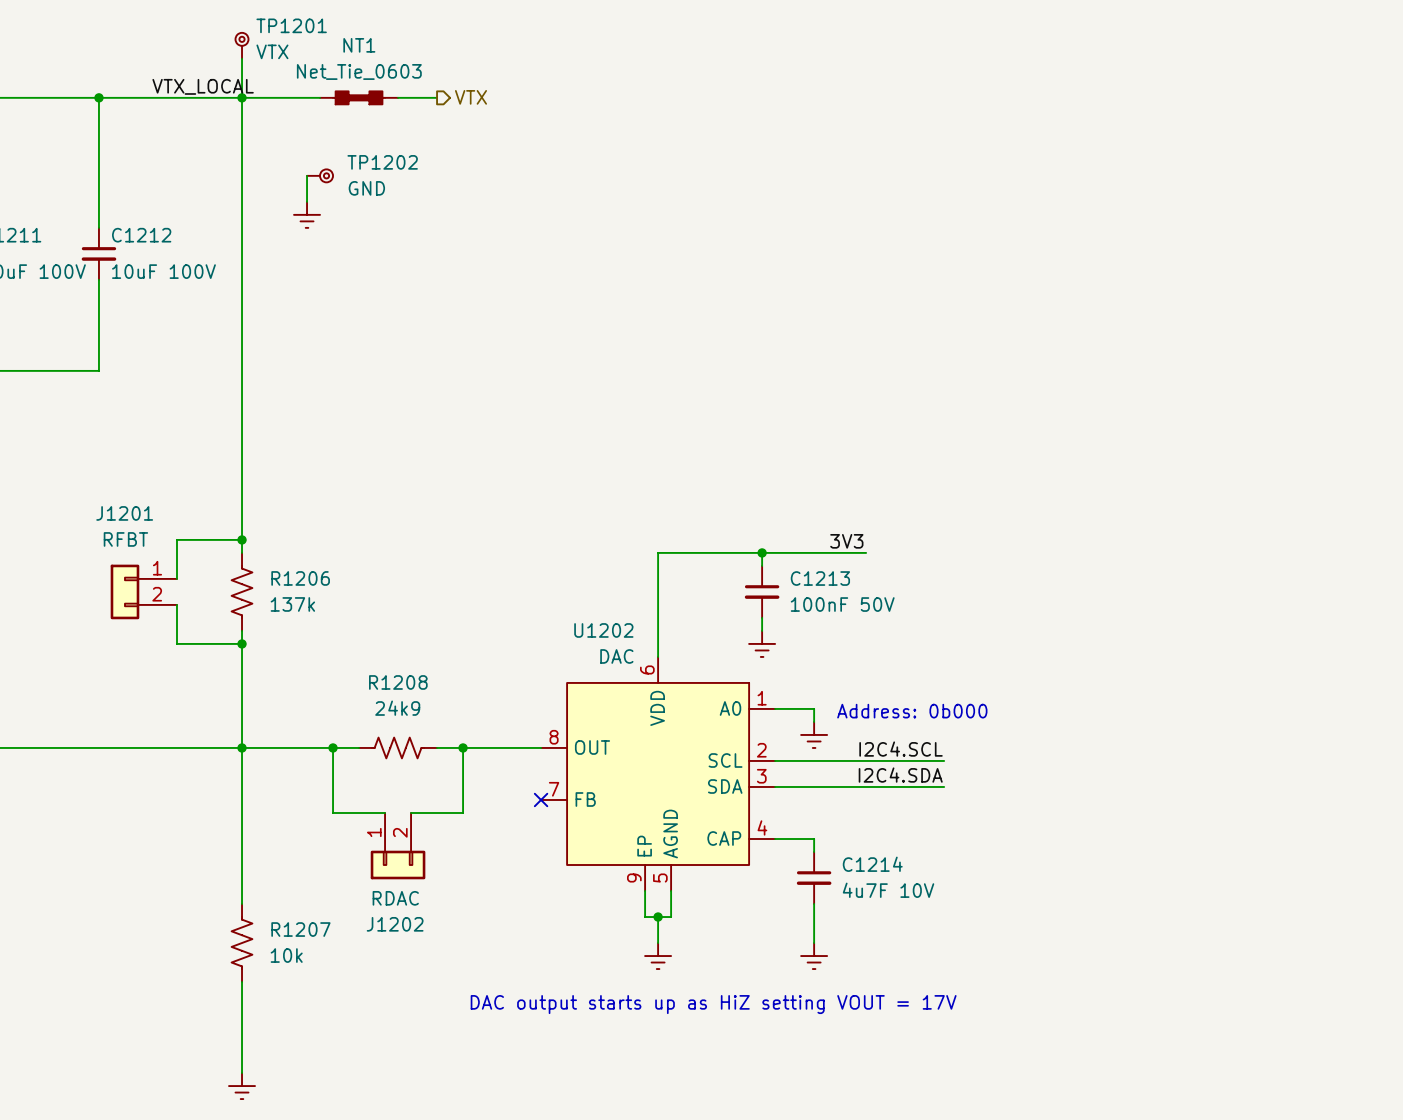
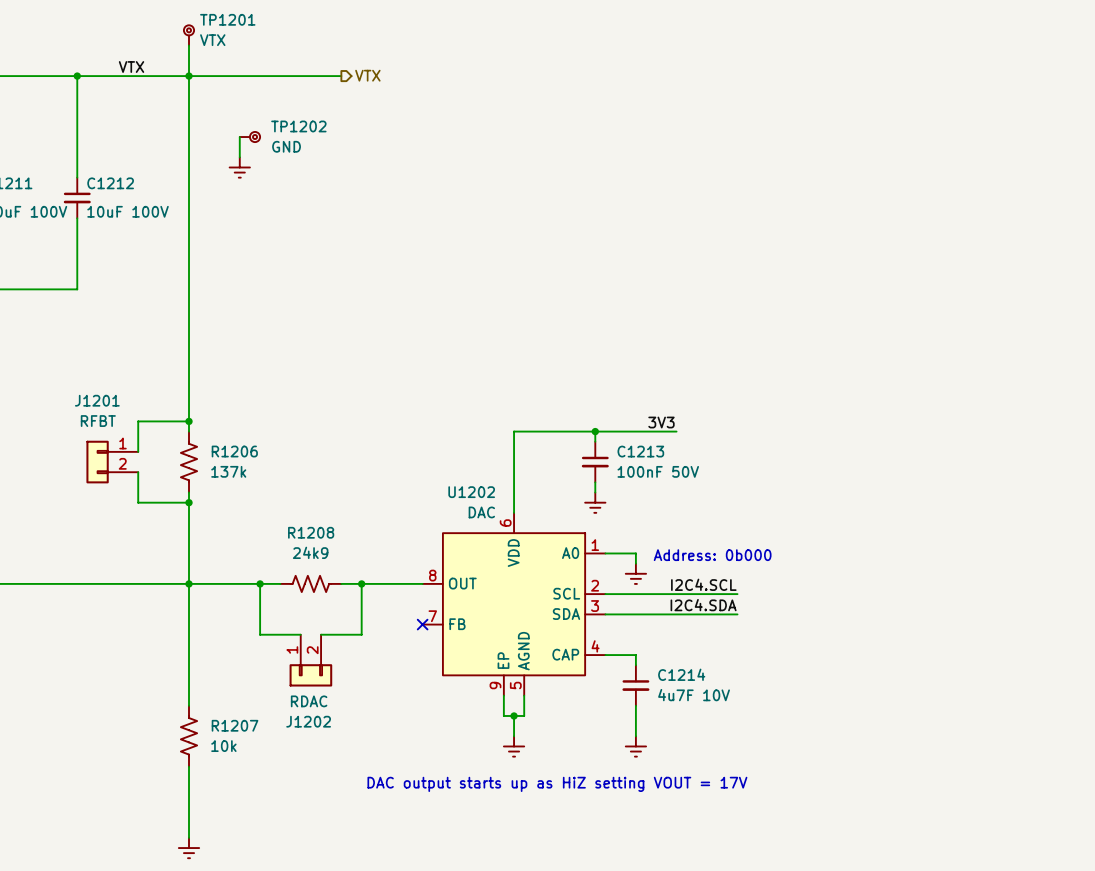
label: VTX_LOCAL (203, 86) -> VTX (131, 67)
NT1: Net_Tie_0603 (359, 97) -> none

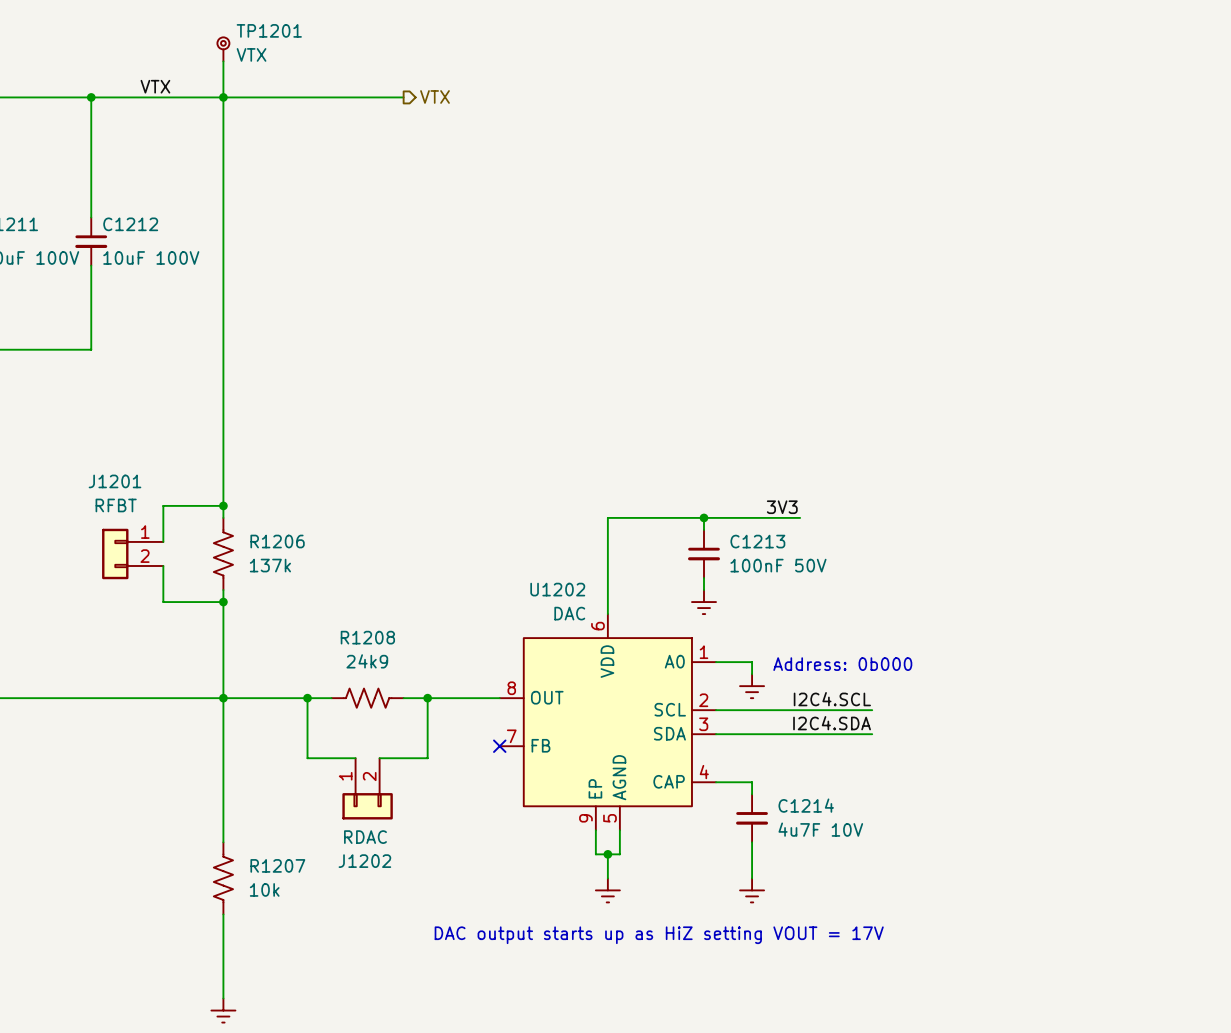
wire: (239, 137) (239, 157) -> none
TP1202: GND (249, 137) -> none
power symbol: (239, 167) -> none

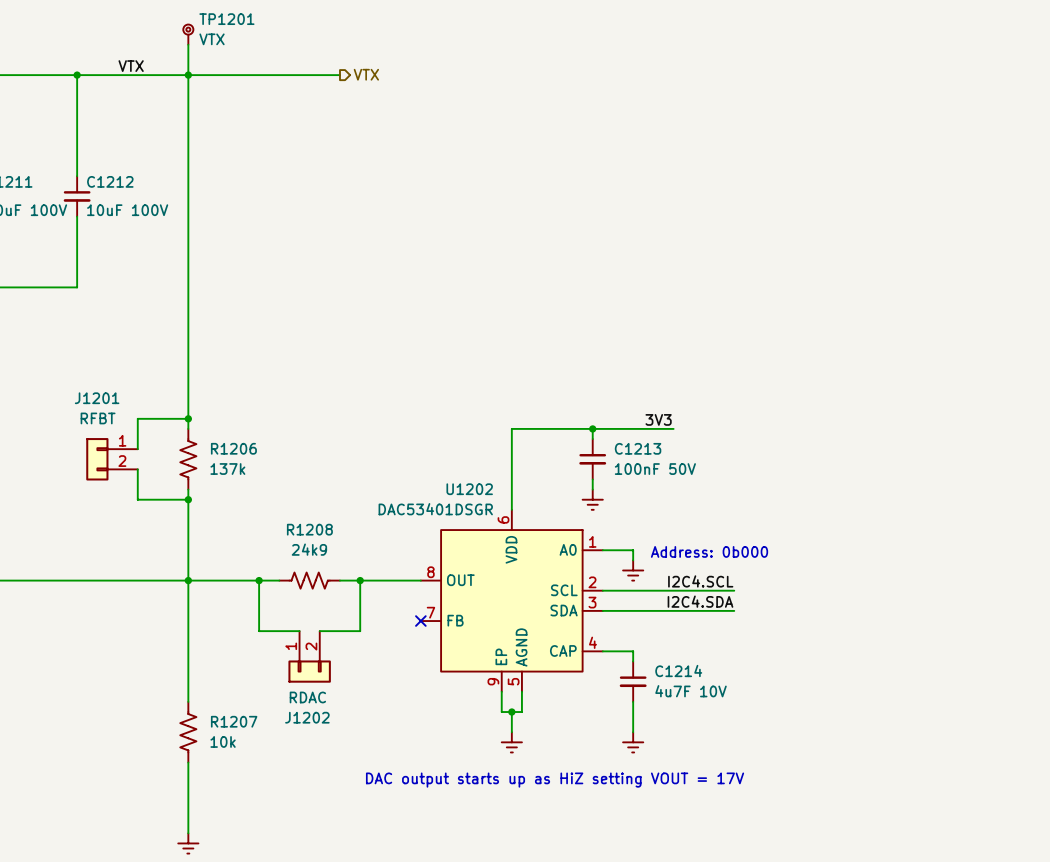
U1202 value: DAC (569, 613) -> DAC53401DSGR (435, 509)

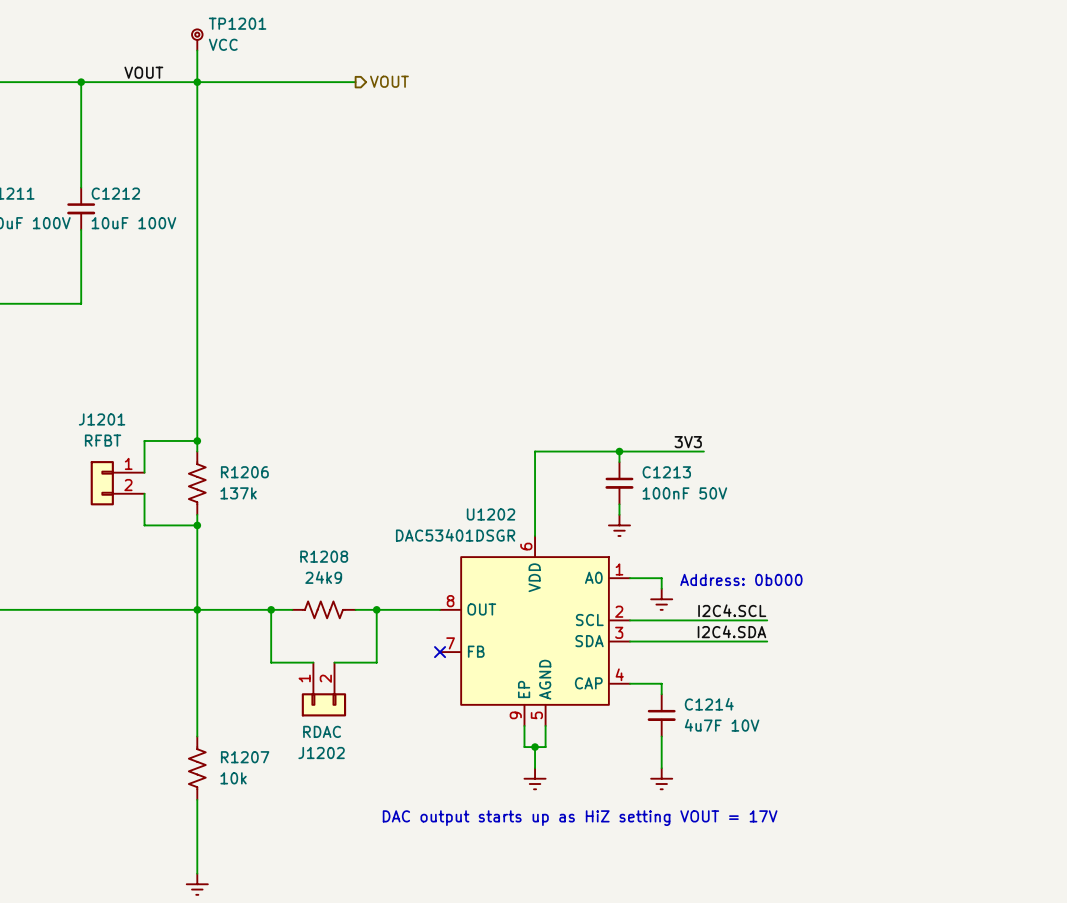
TP1201 value: VTX (212, 39) -> VCC (223, 44)
label: VTX (131, 66) -> VOUT (143, 72)
hierarchical label: VTX (366, 74) -> VOUT (389, 81)

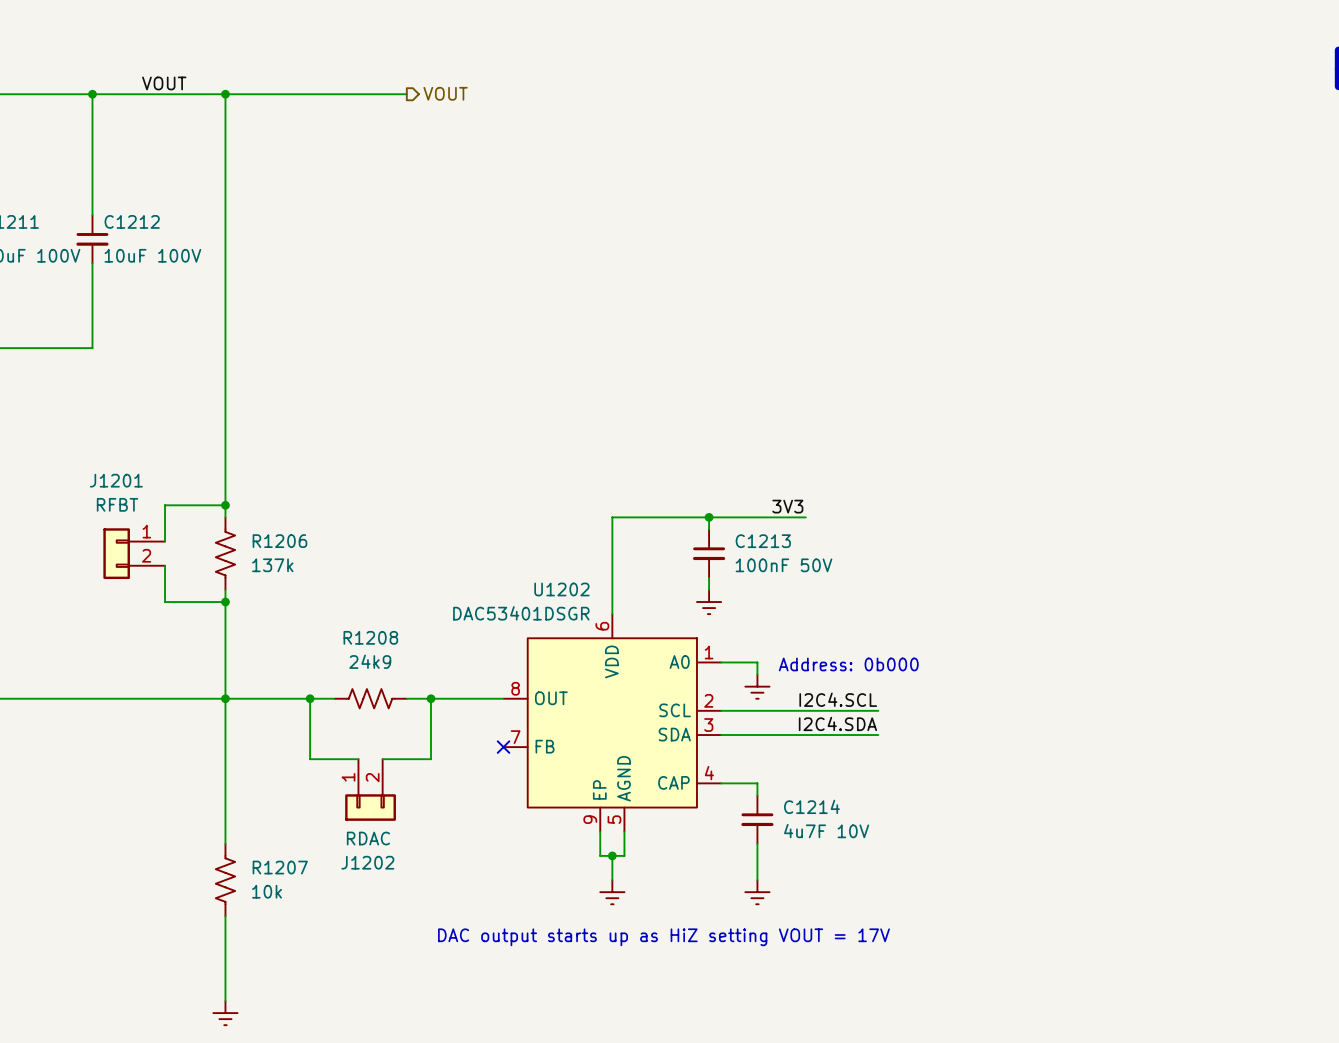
TP1201: VCC (197, 39) -> none
wire: (197, 50) (197, 82) -> none

